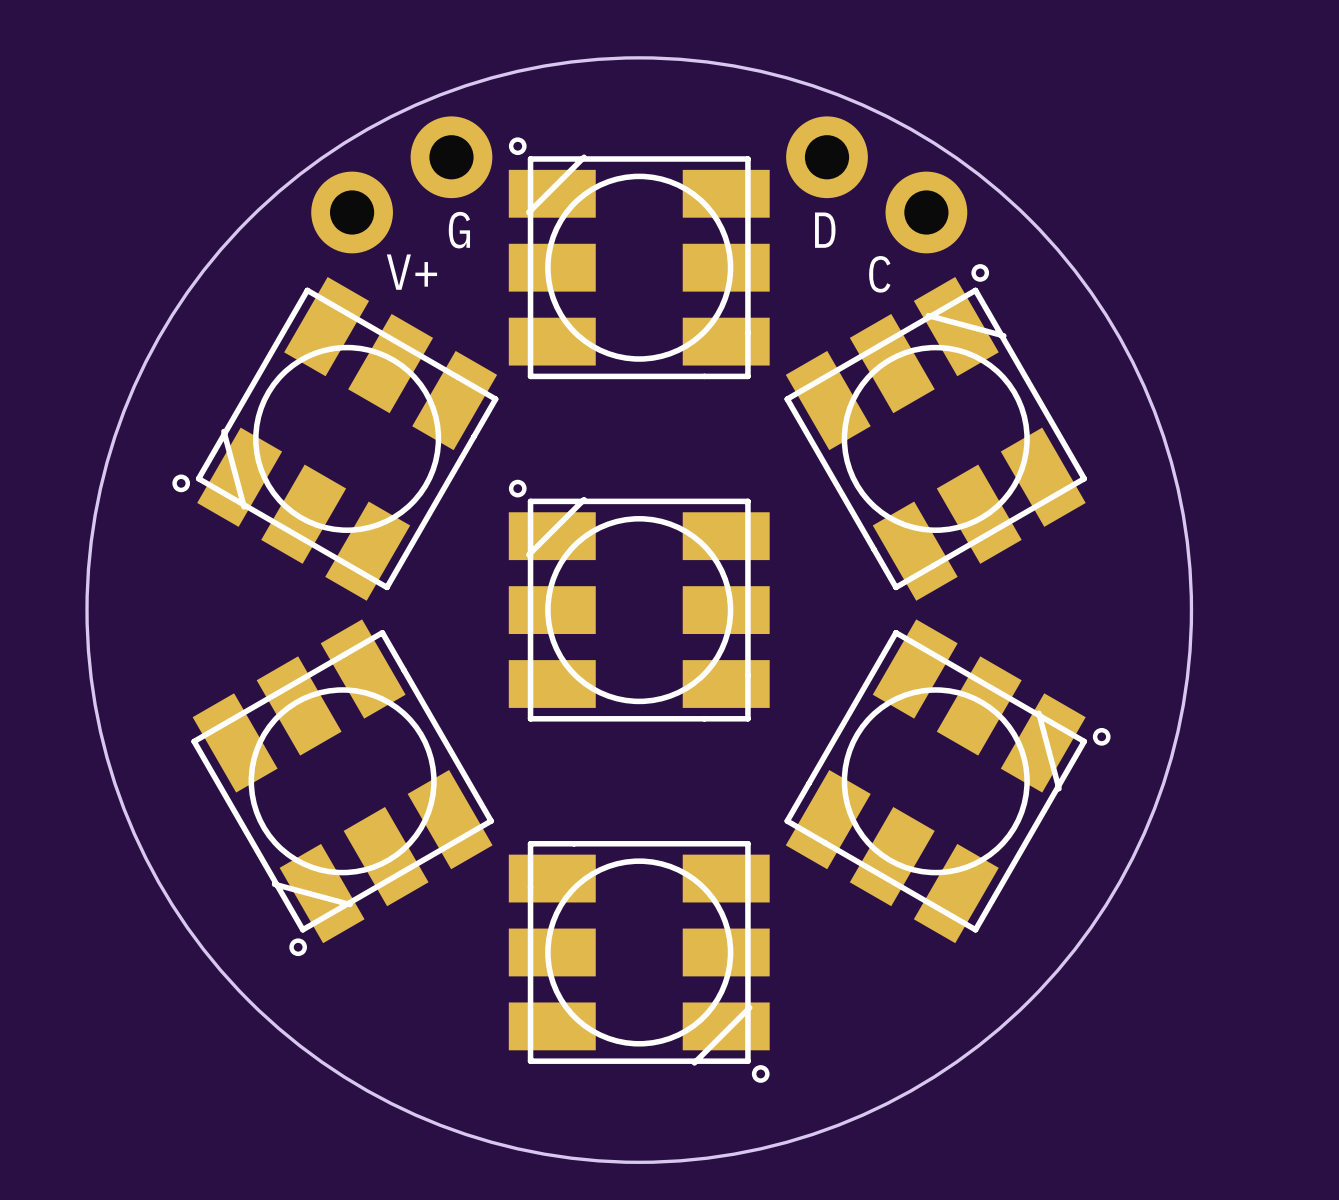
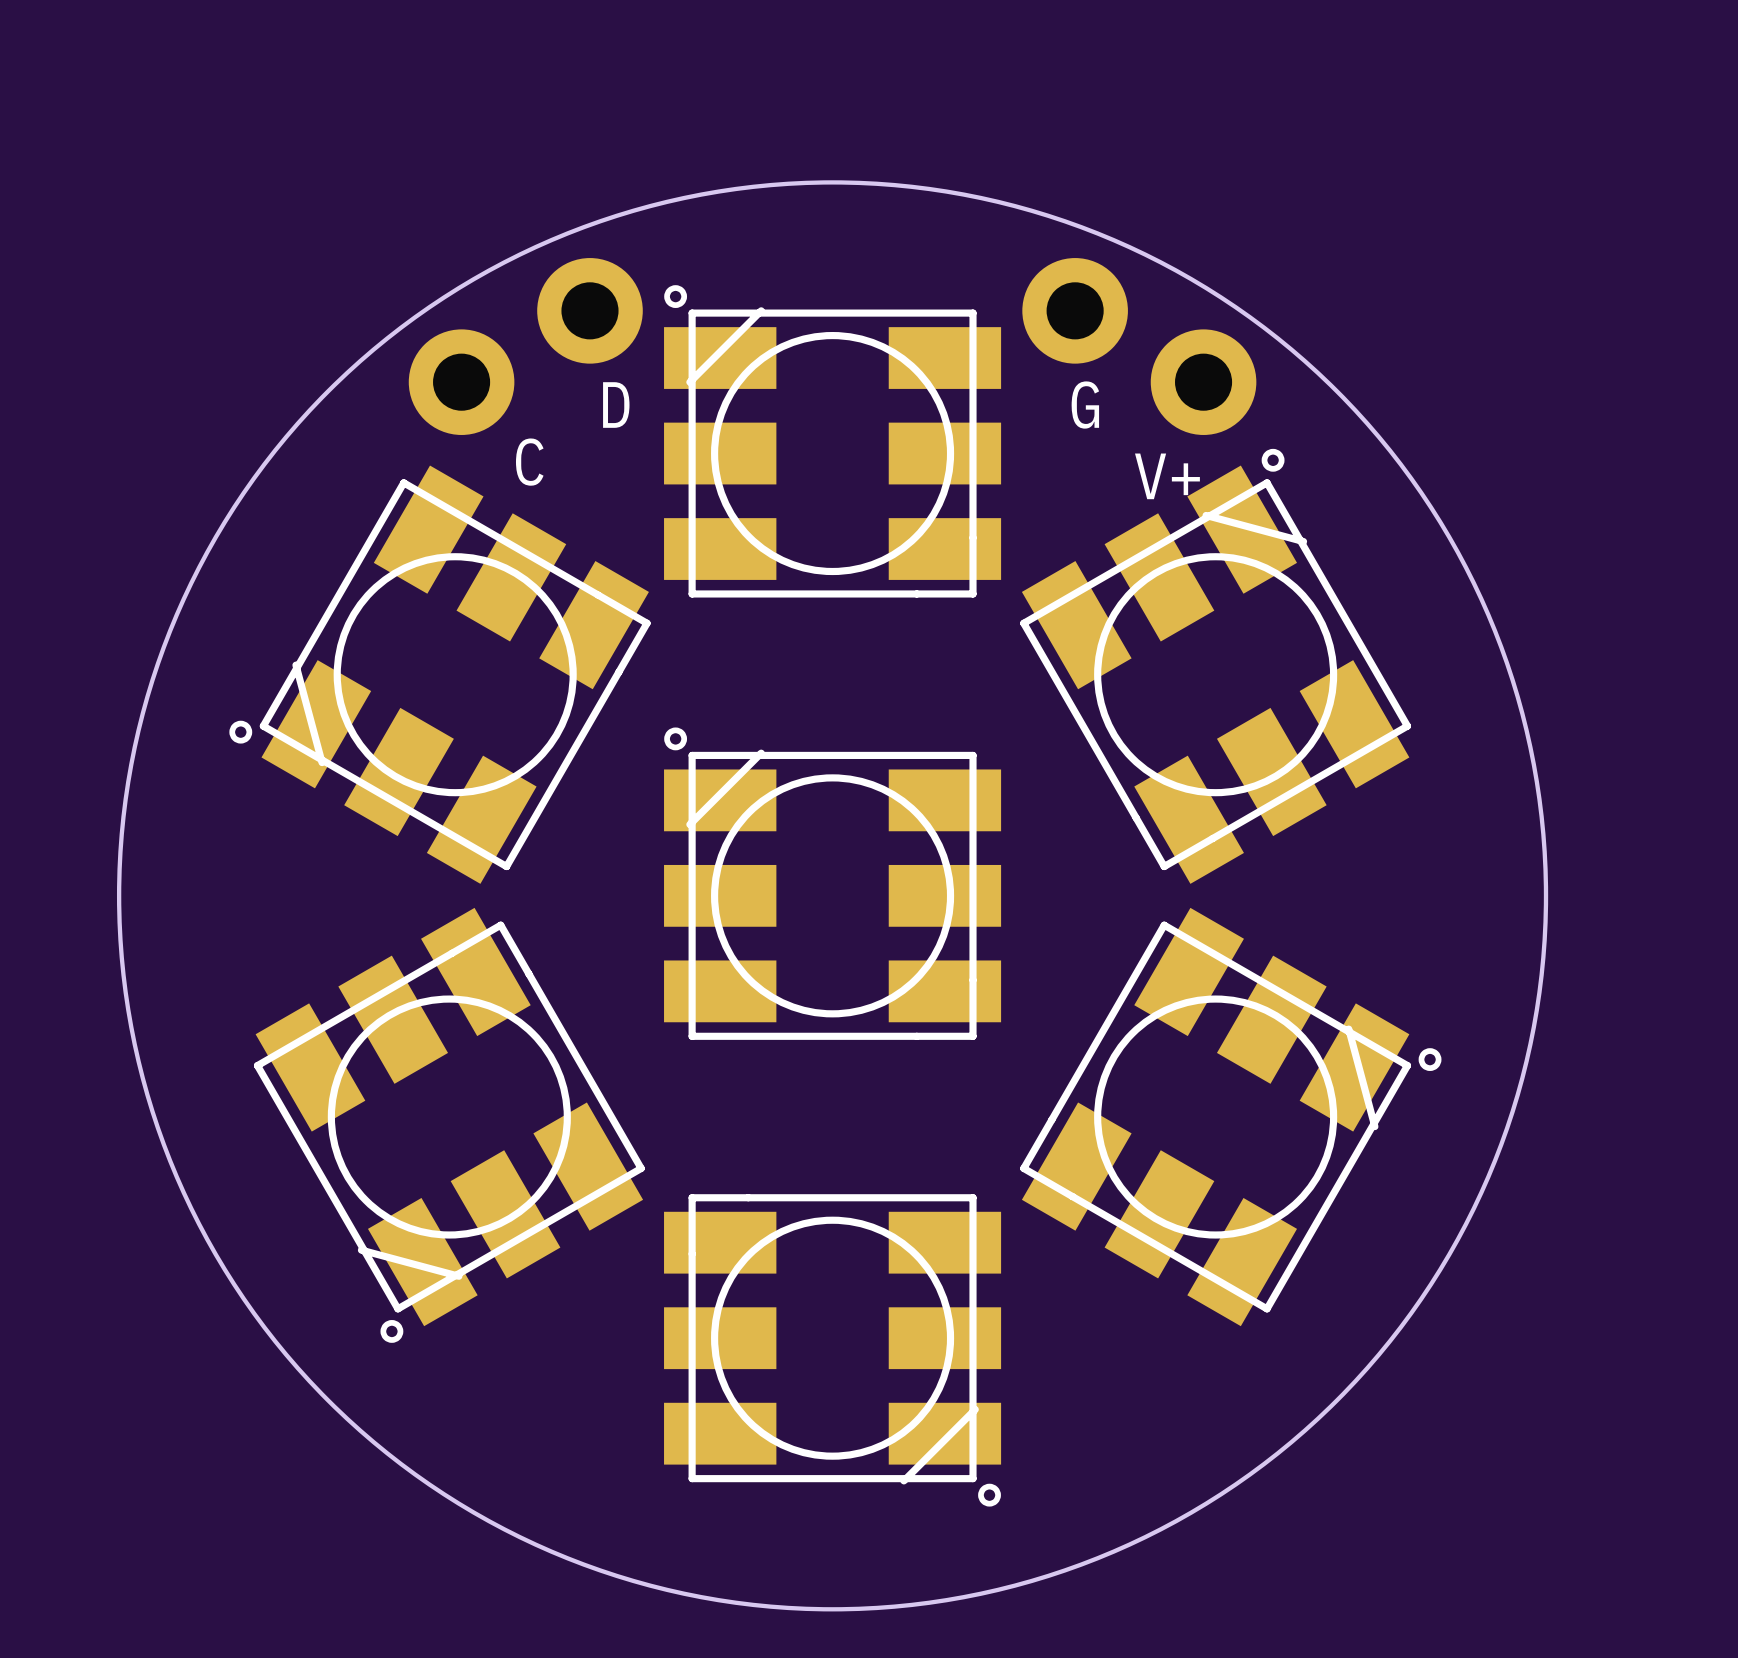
text: G (459, 230) -> D (616, 405)
text: D (825, 230) -> G (1085, 405)
text position: V+ (411, 272) -> V+ (1167, 476)
text position: C (879, 274) -> C (529, 462)

